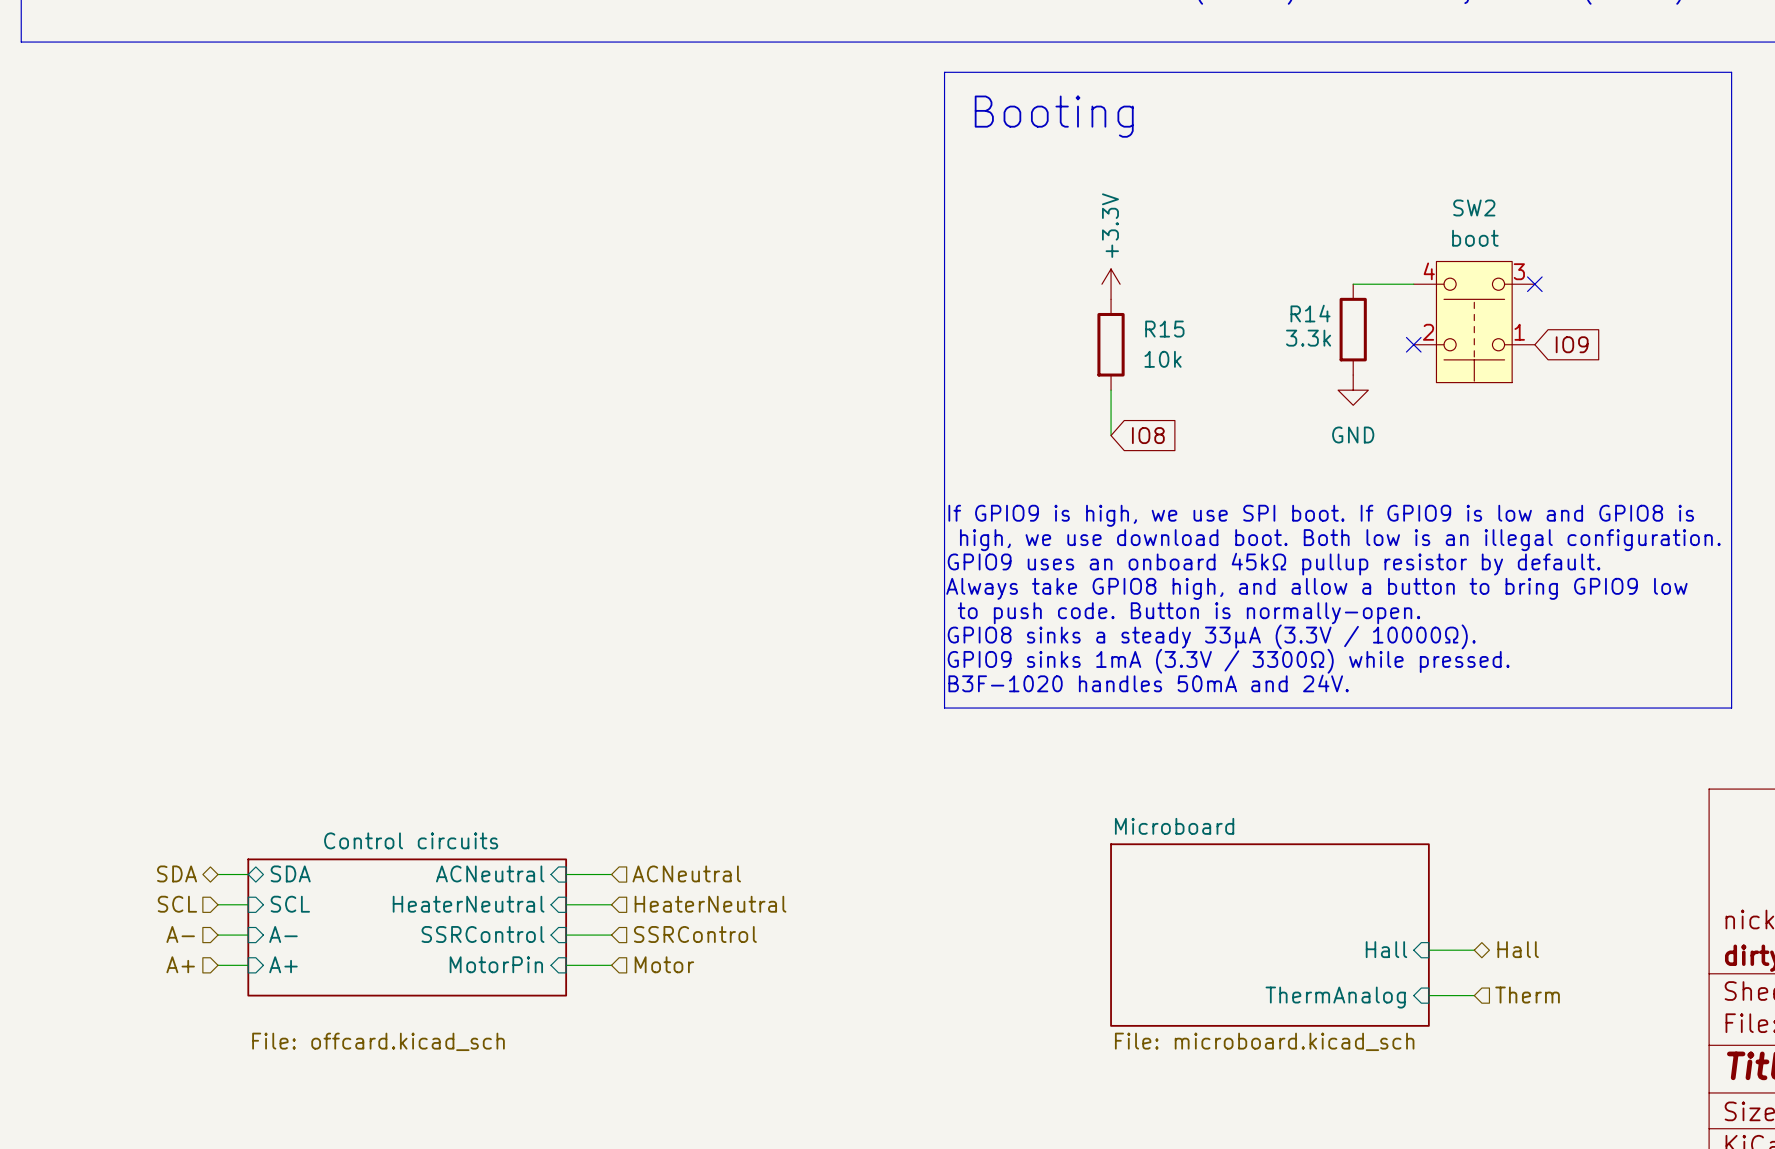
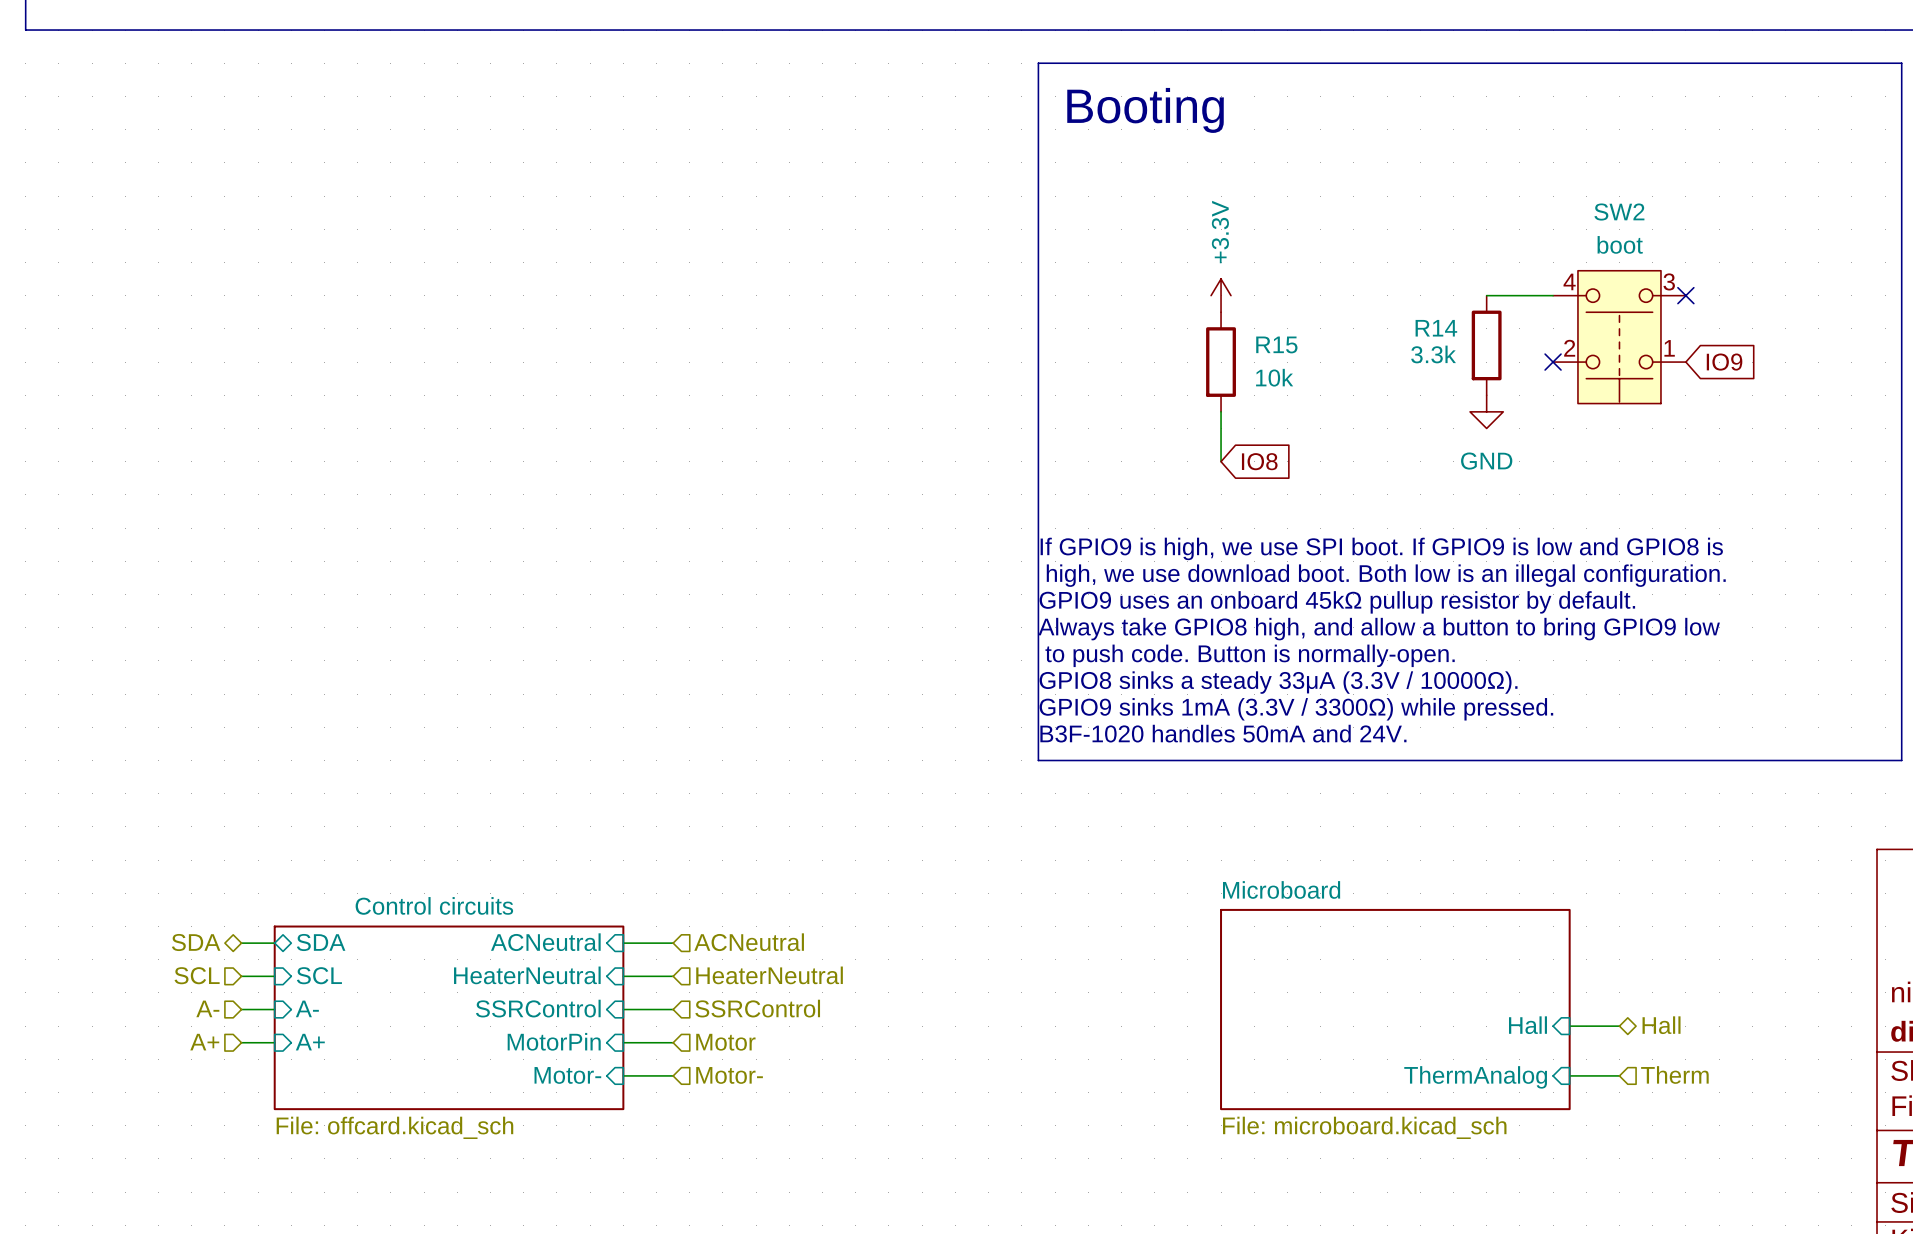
sheet Control circuits: File: offcard.kicad_sch (407, 927) -> none
sheet Control circuits: none -> File: offcard.kicad_sch (449, 1017)
sheet pin: none -> Motor- (567, 1075)
wire: none -> (623, 1075) (673, 1075)
hierarchical label: none -> Motor- (729, 1075)

